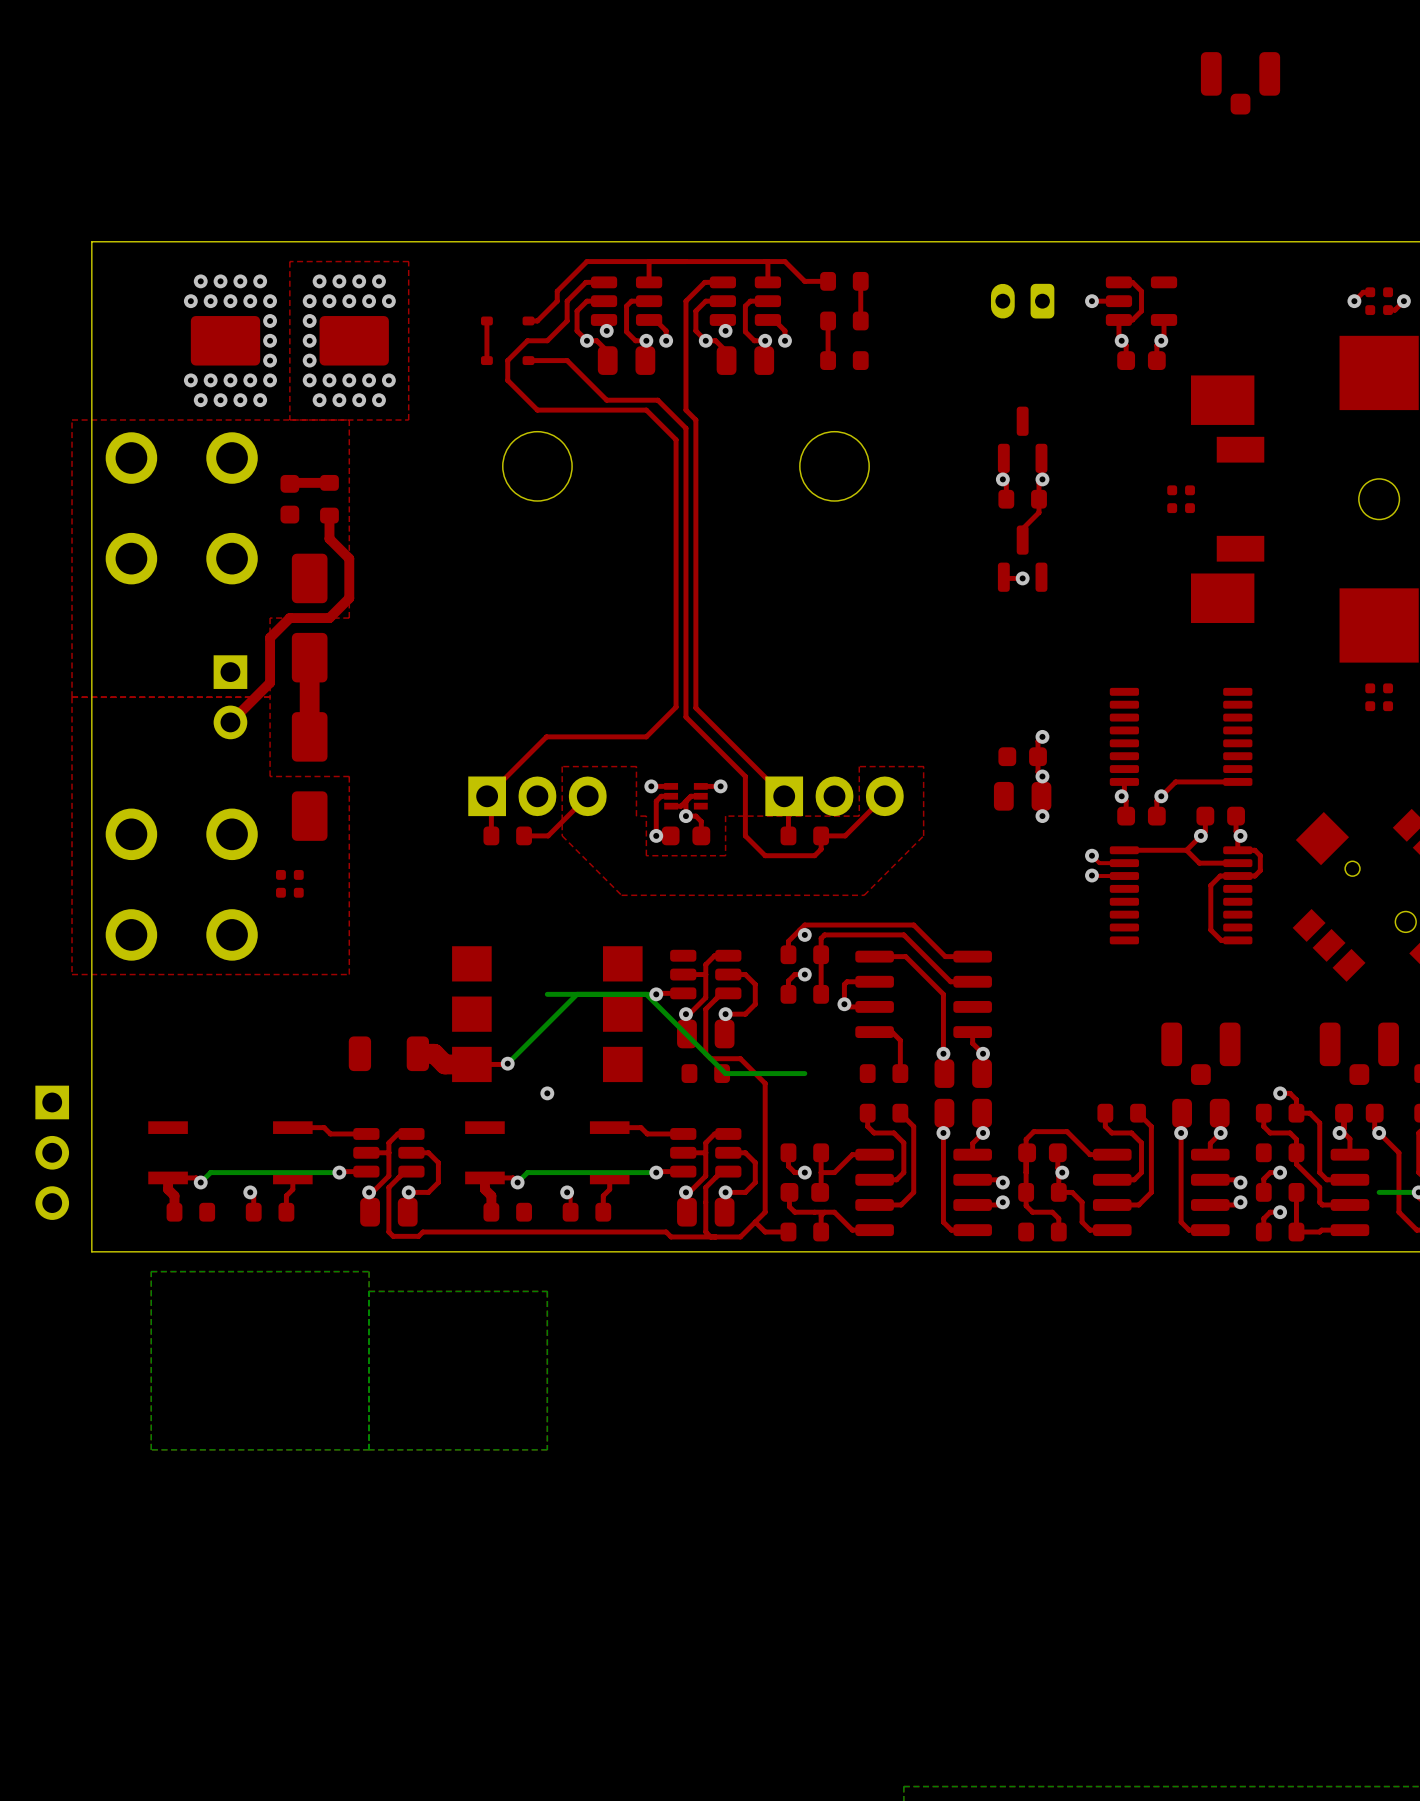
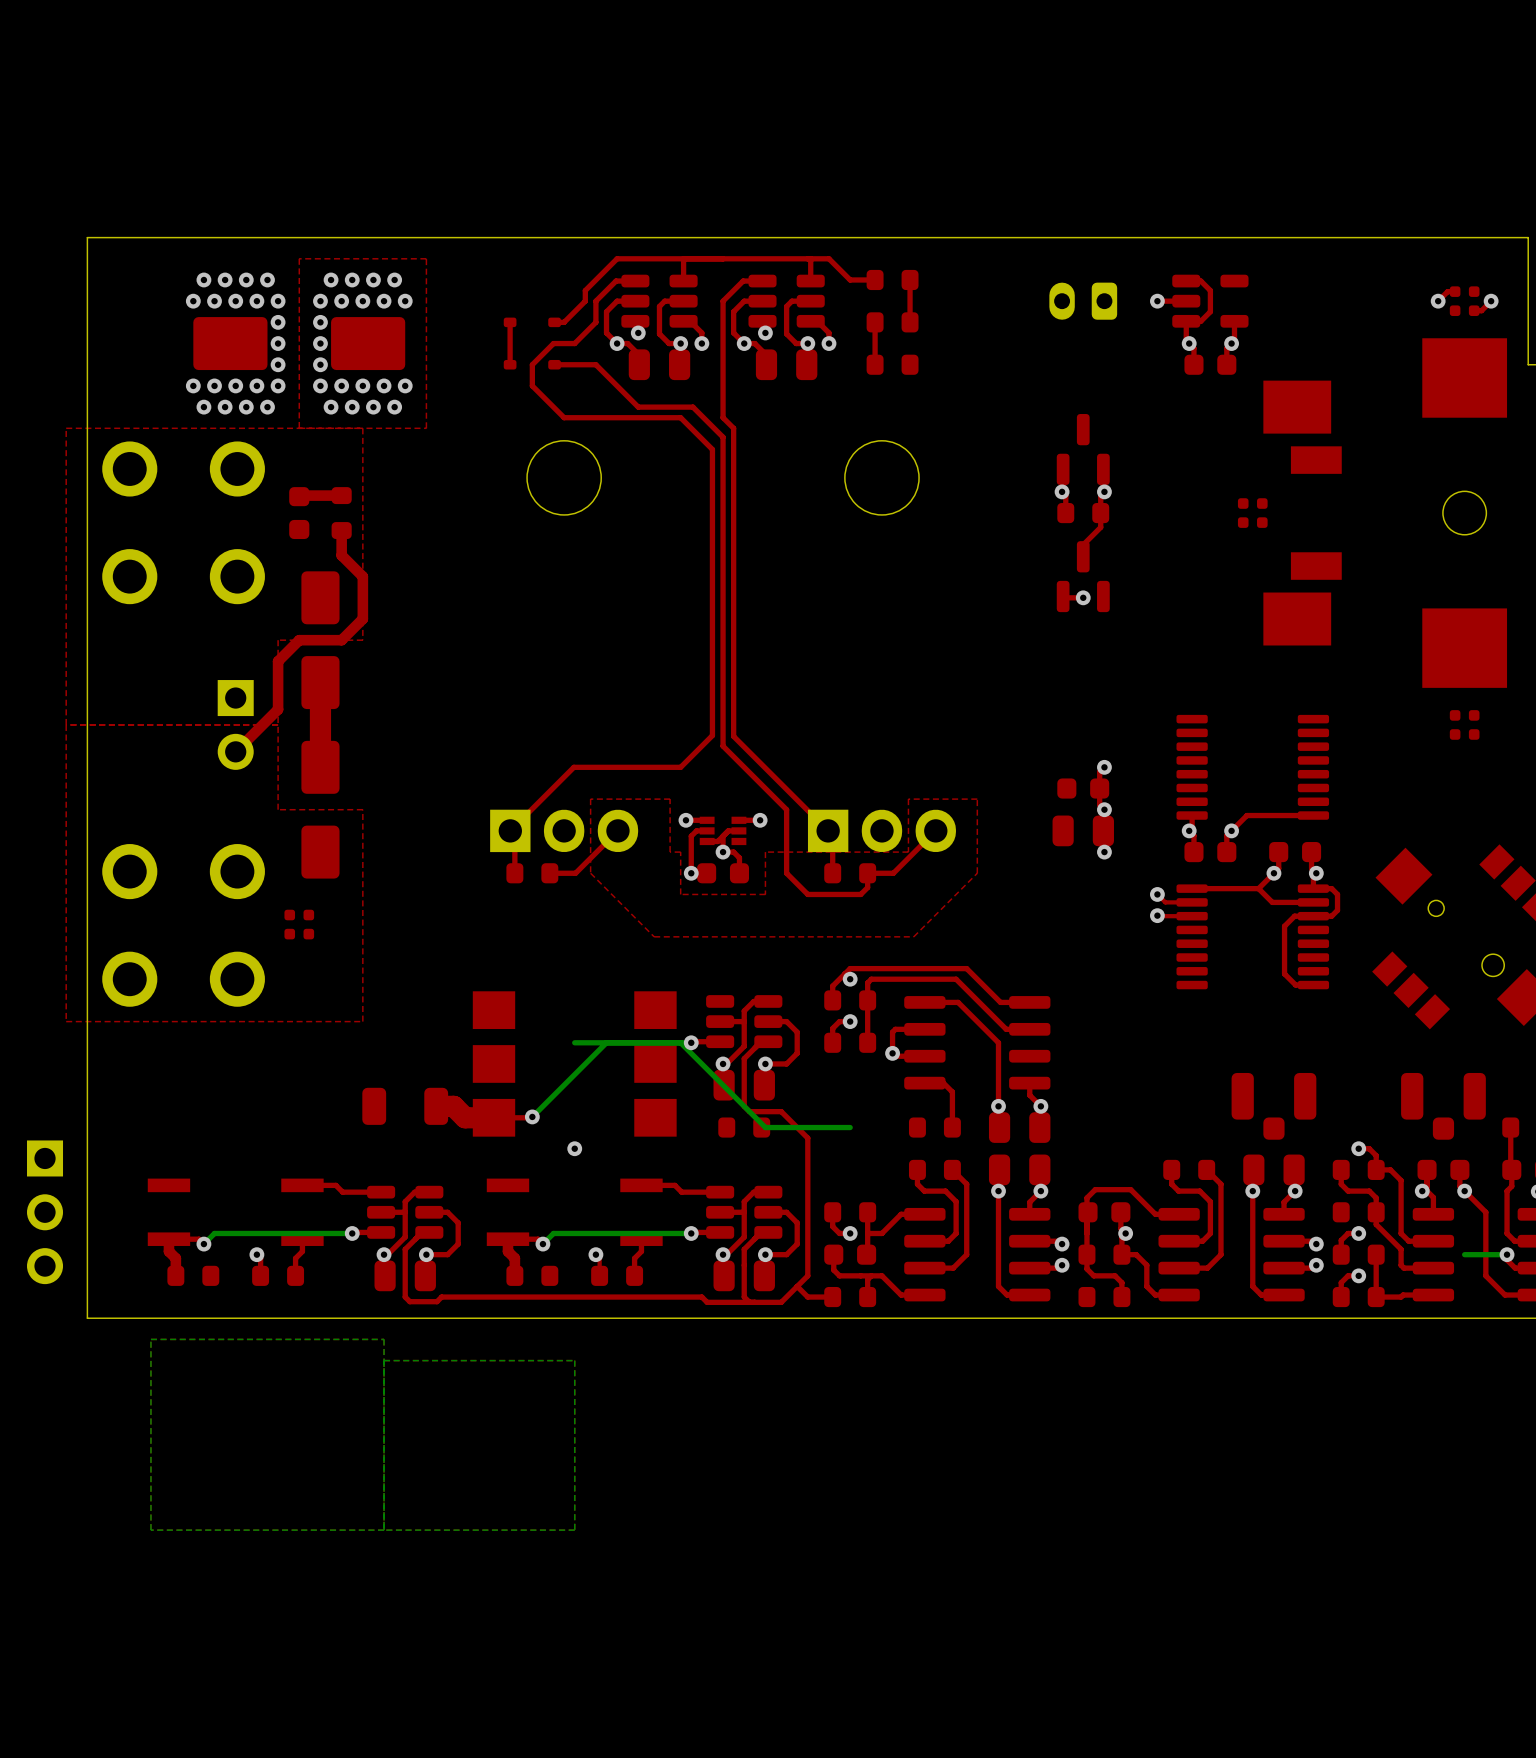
part: (1240, 83) -> none

